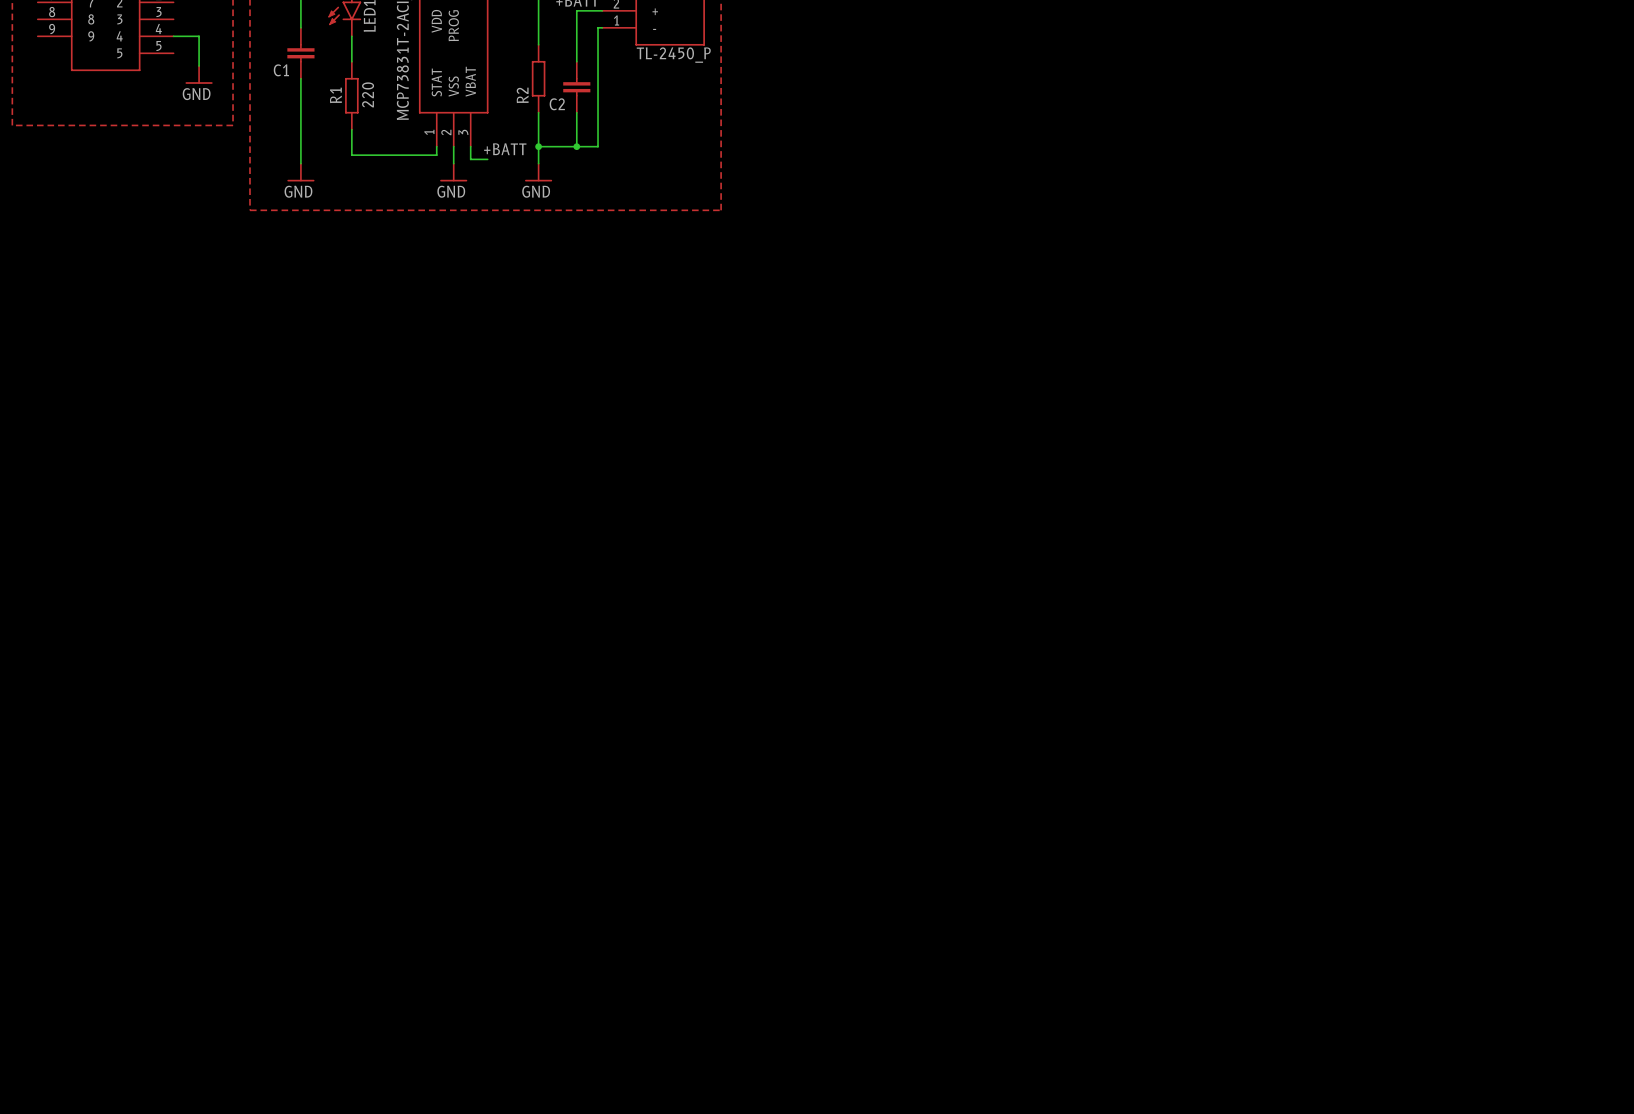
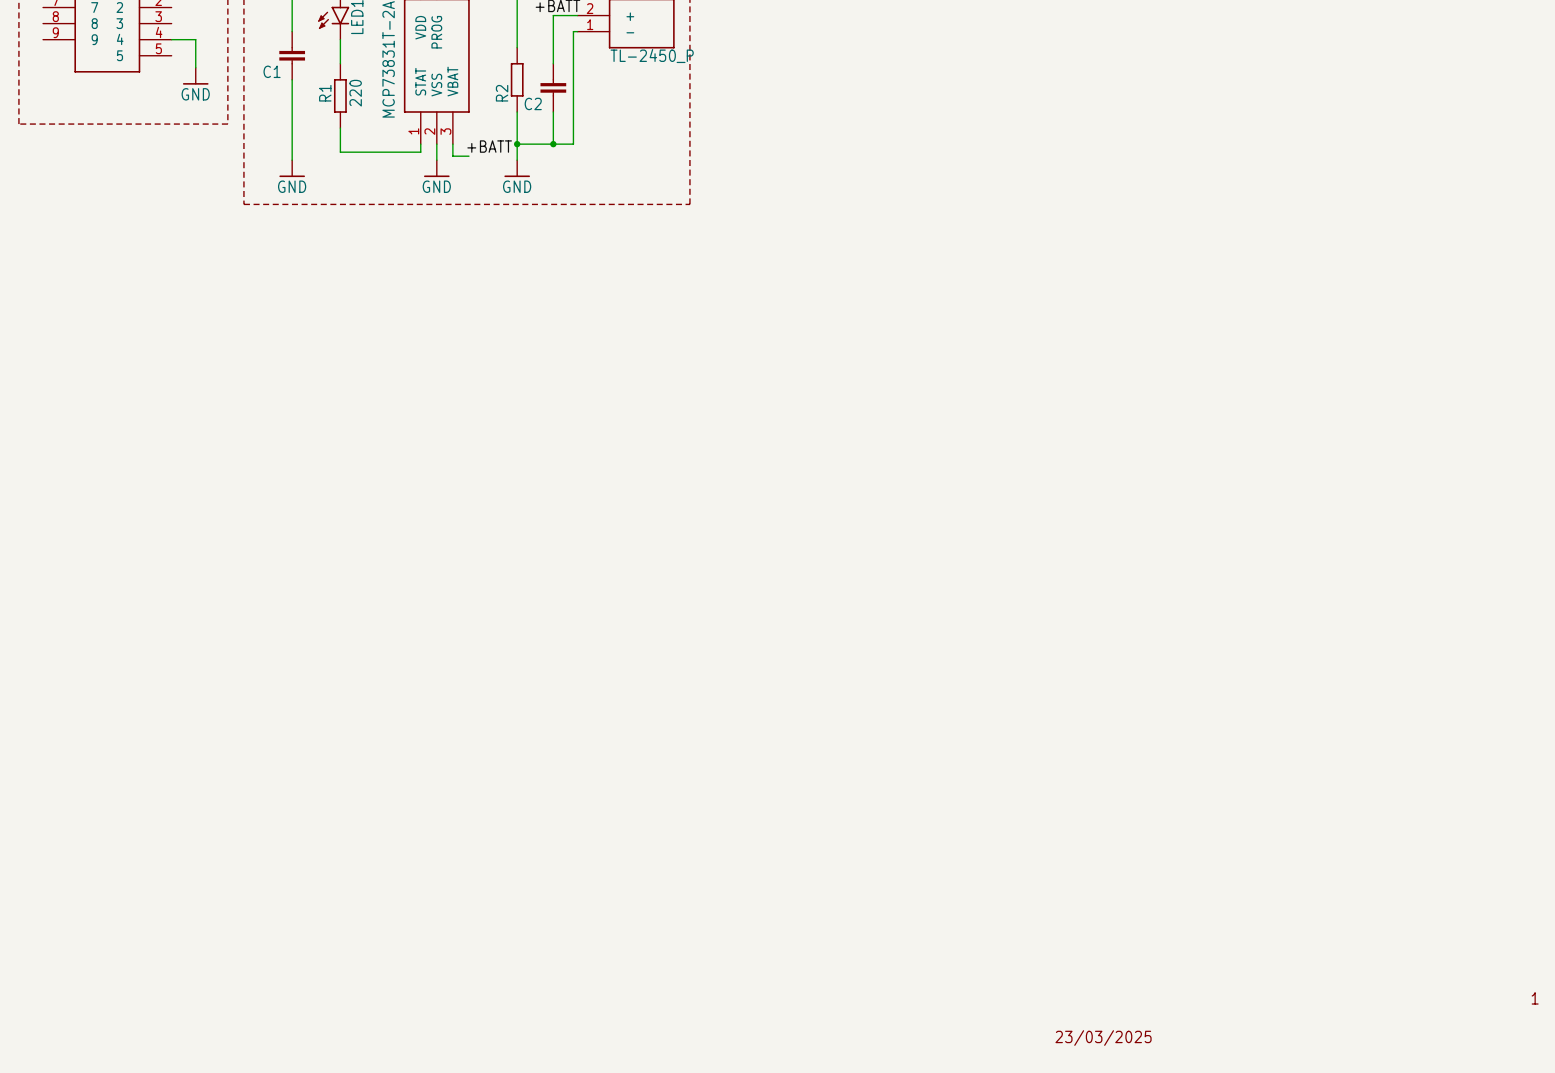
text: none -> 1 (1535, 998)
text: none -> 23/03/2025 (1103, 1038)

